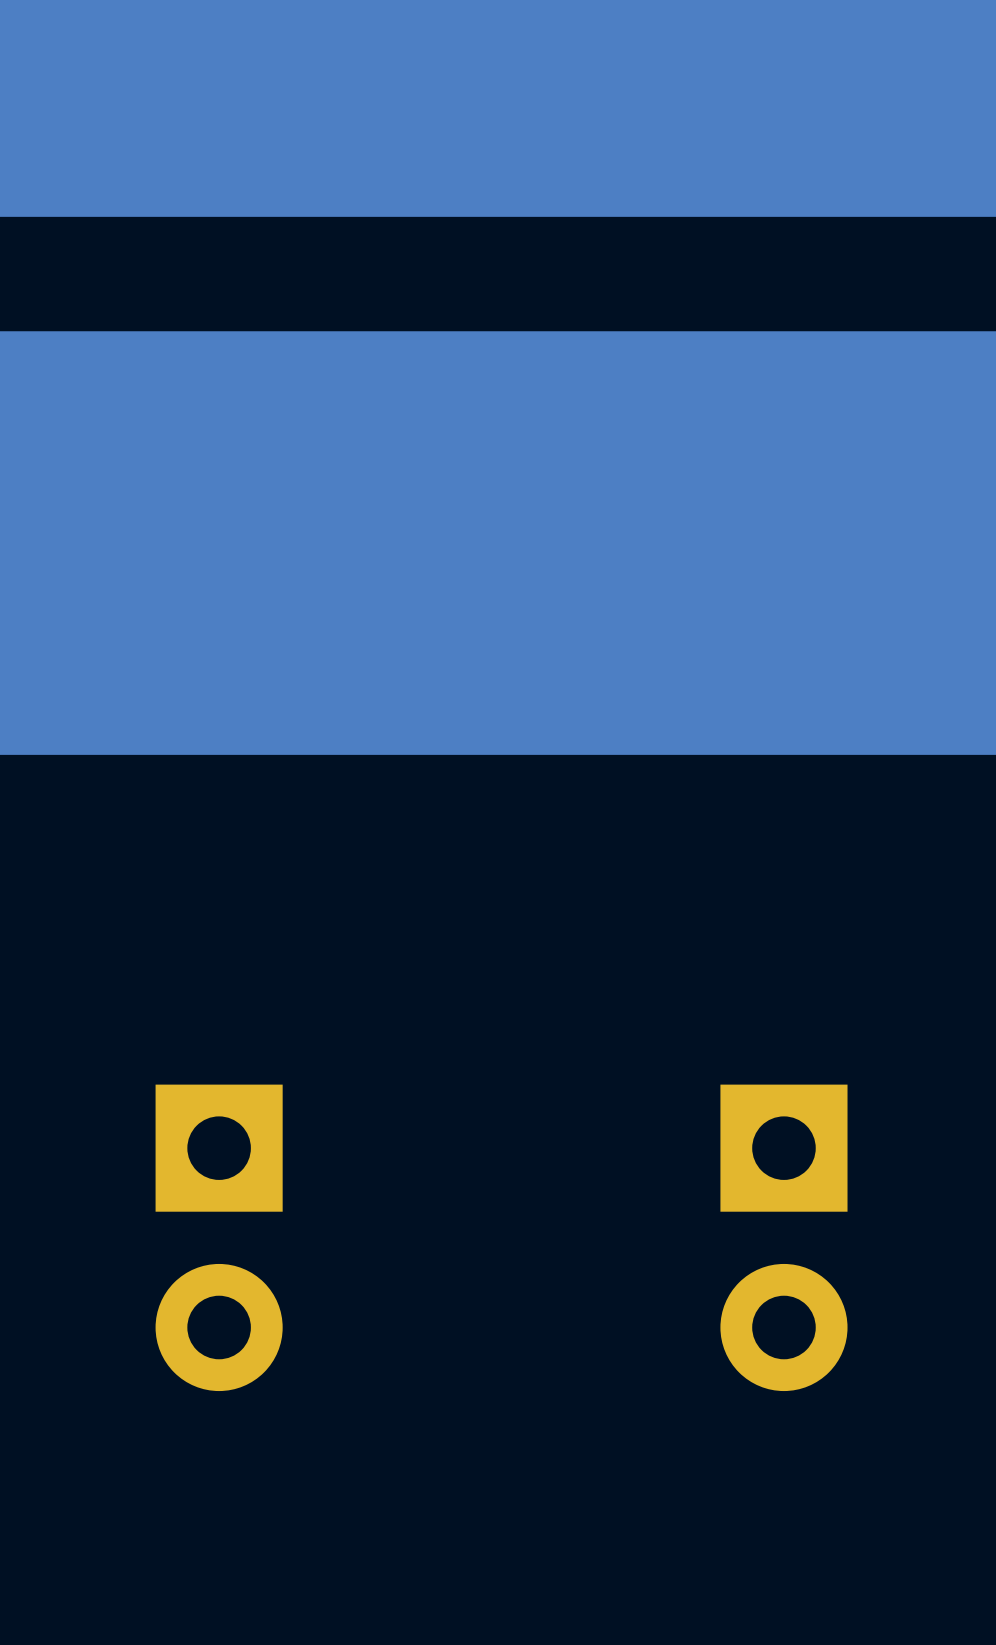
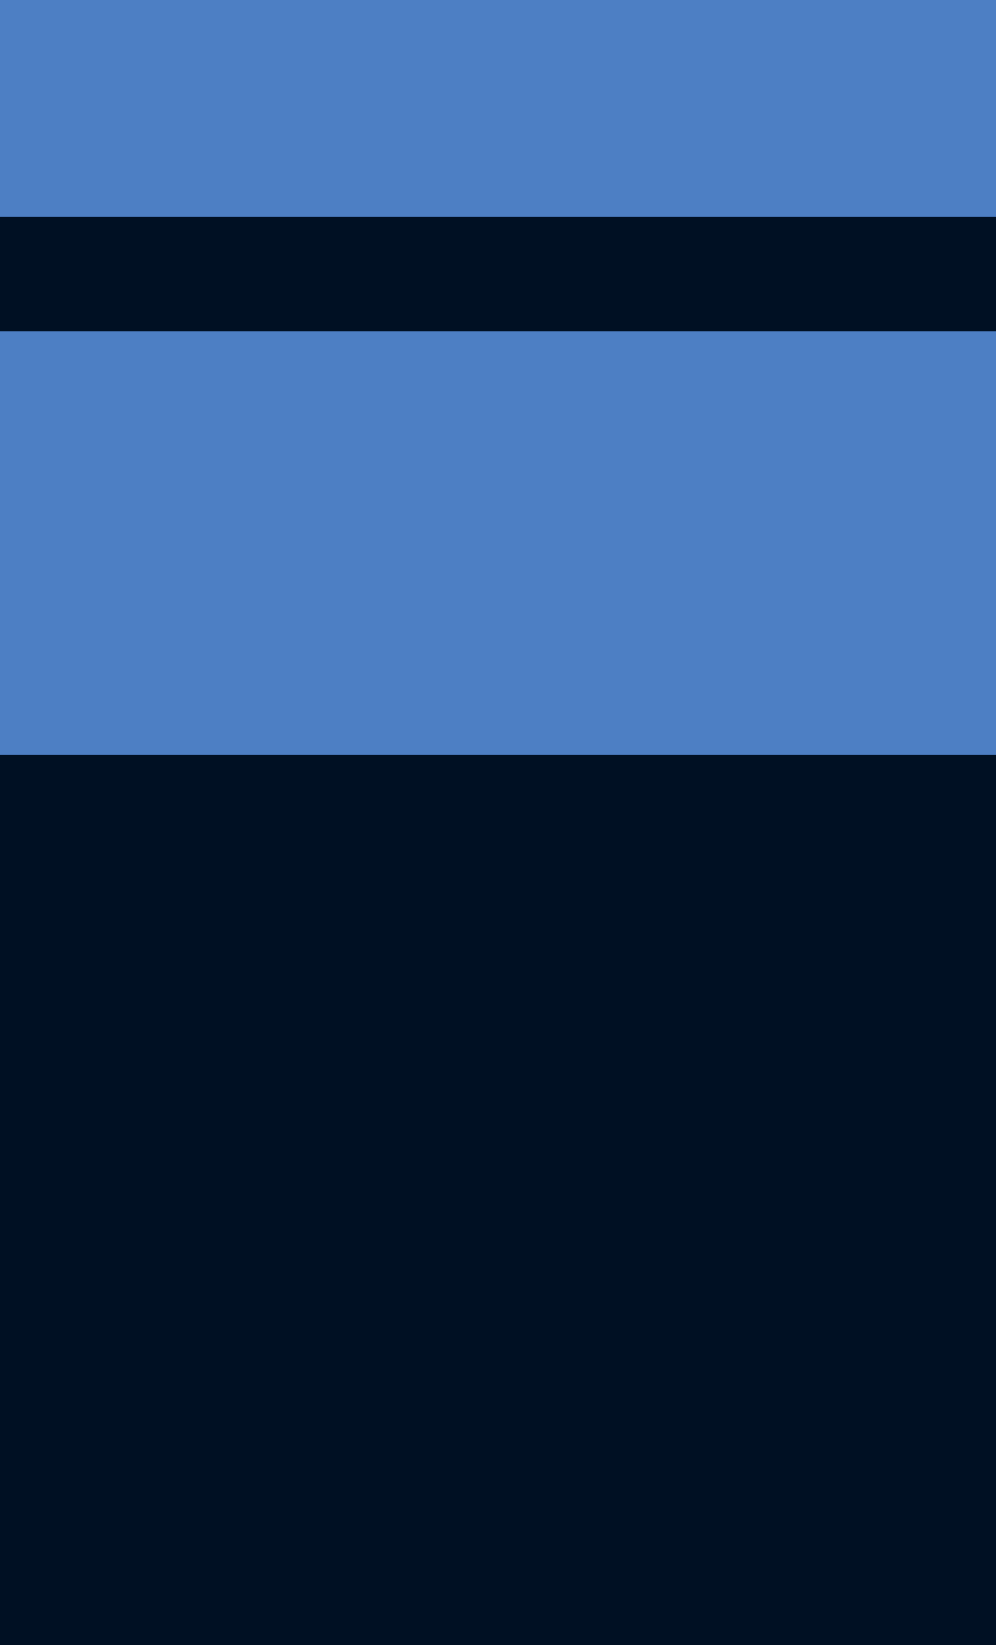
part: (219, 1237) -> none
part: (783, 1237) -> none

